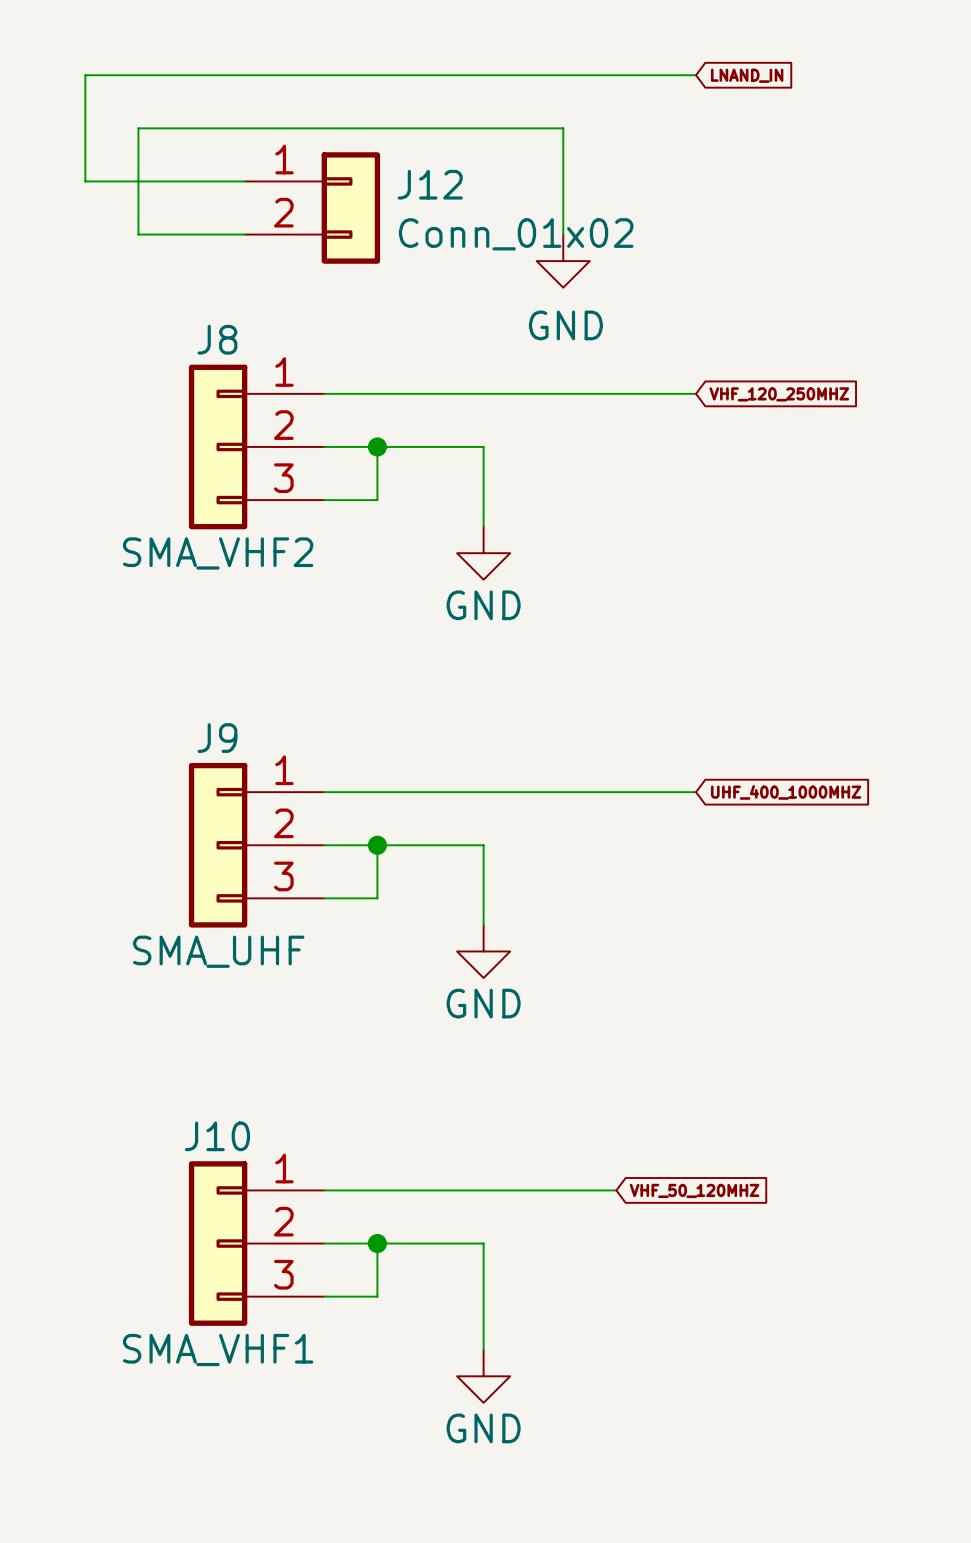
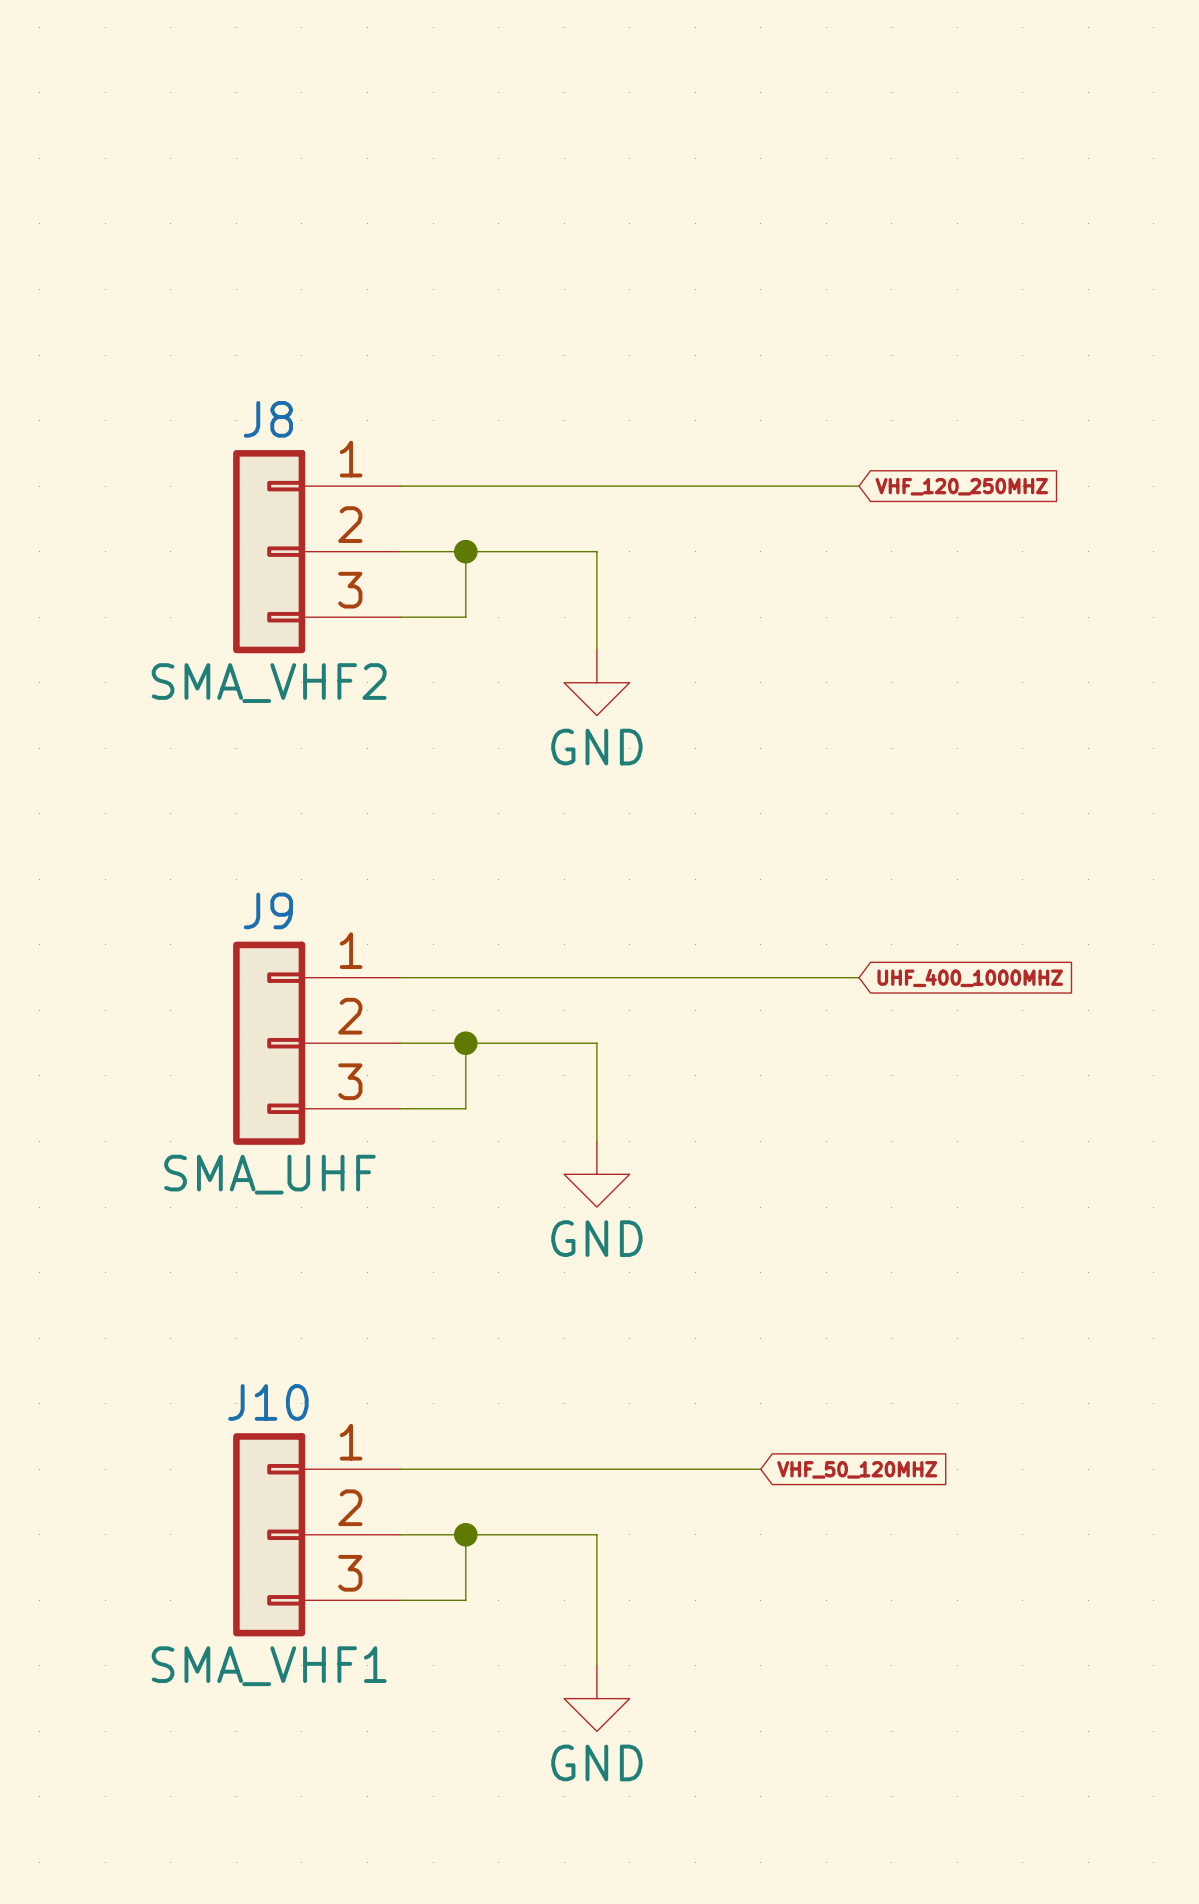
wire: (696, 75) (85, 75) (85, 181) (244, 181) -> none
global label: LNAND_IN (747, 75) -> none
J12: Conn_01x02 (312, 208) -> none
wire: (244, 234) (138, 234) (138, 128) (563, 128) (563, 234) -> none
power symbol: GND (563, 261) -> none

